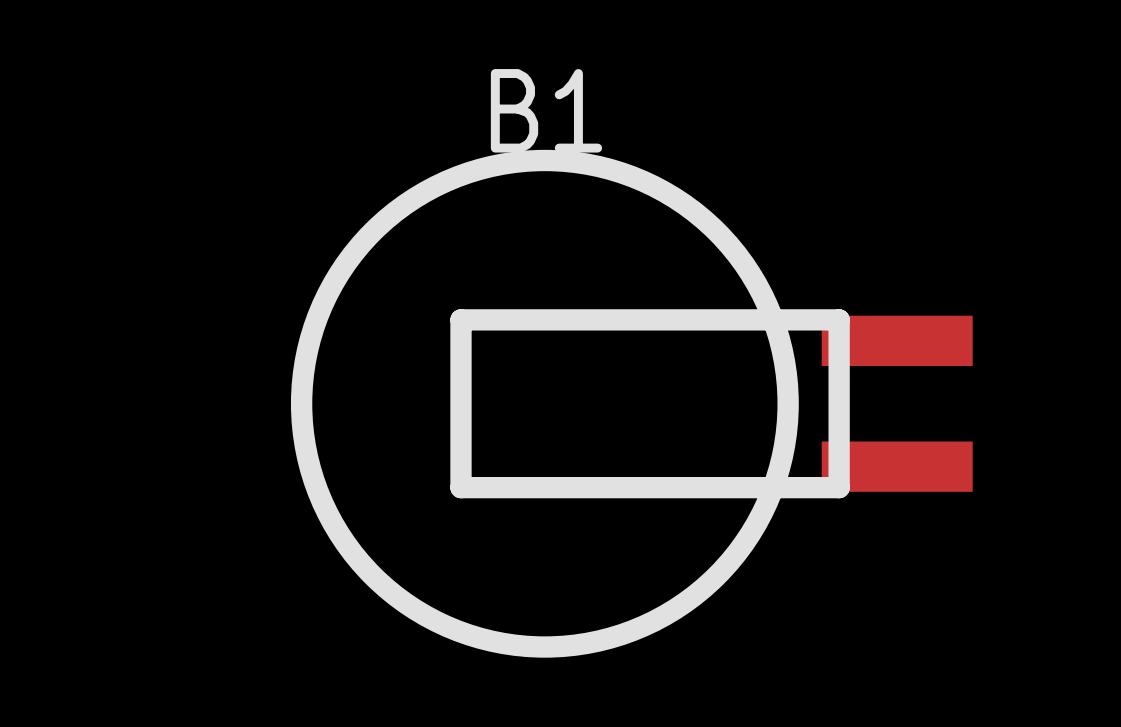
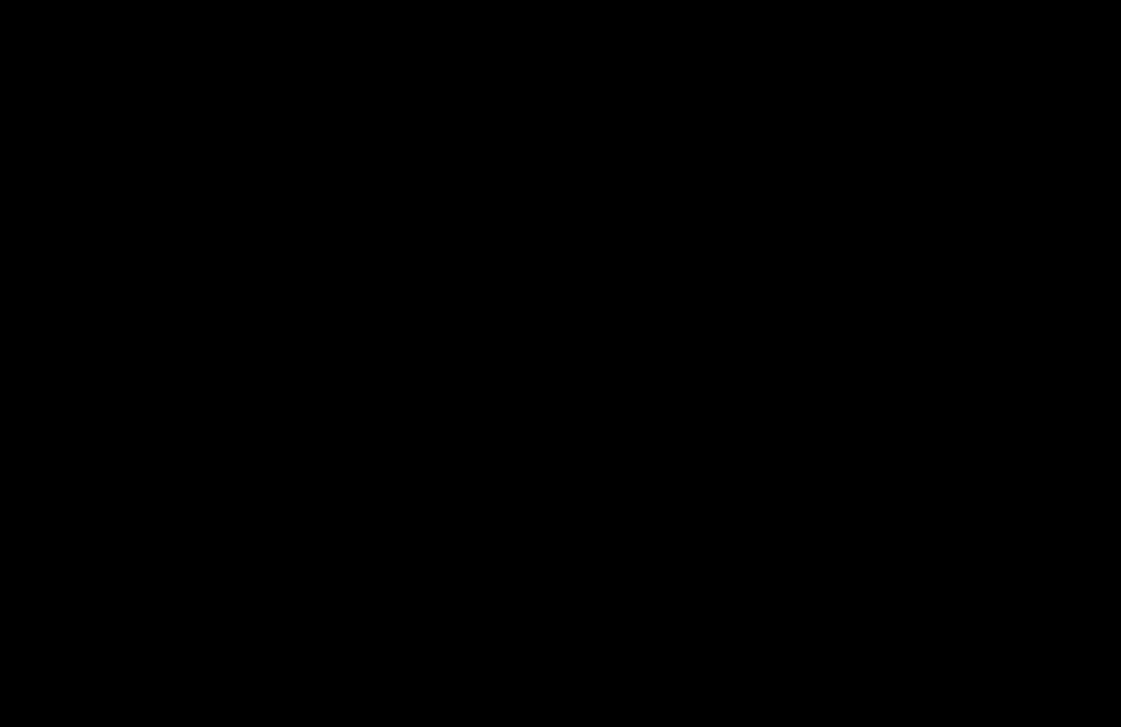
B1: (631, 403) -> none

